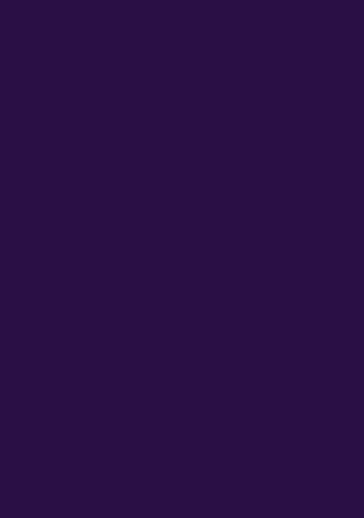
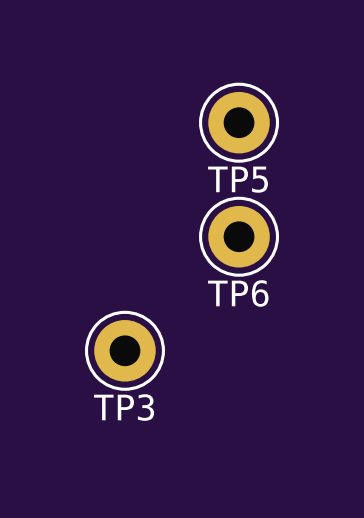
TP5: none -> (239, 122)
TP6: none -> (239, 236)
TP3: none -> (124, 350)

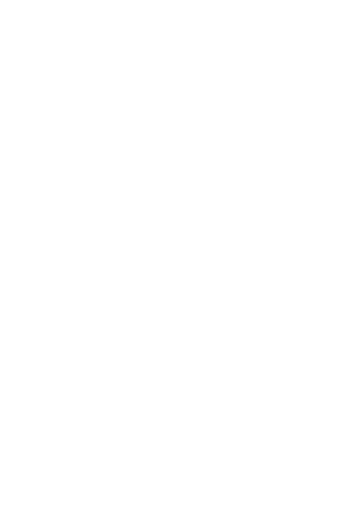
TP5: (239, 122) -> none
TP6: (239, 236) -> none
TP3: (124, 350) -> none

